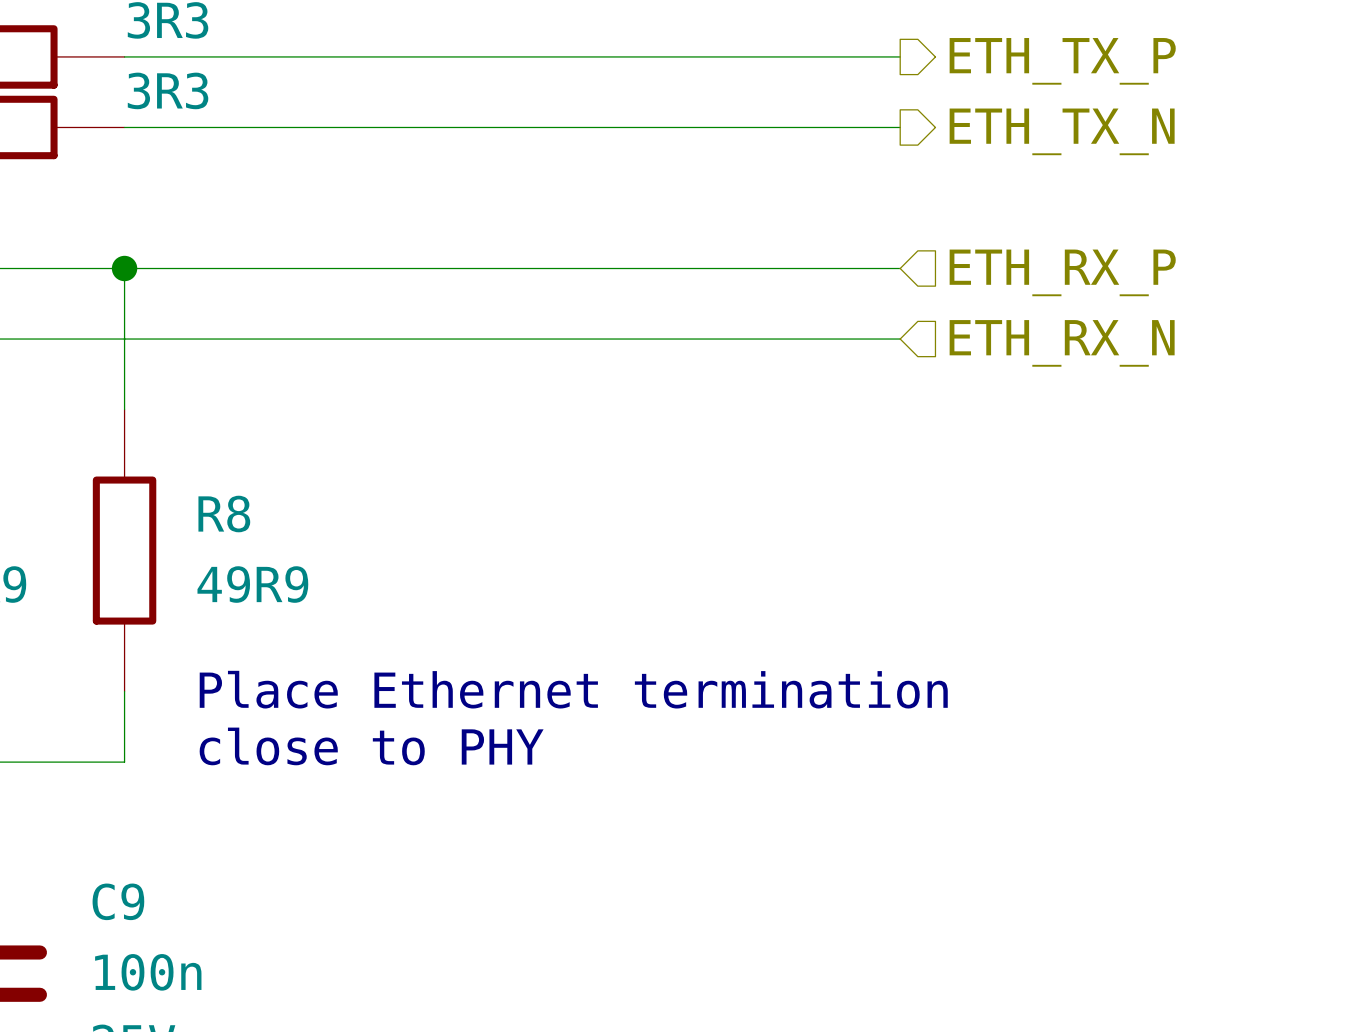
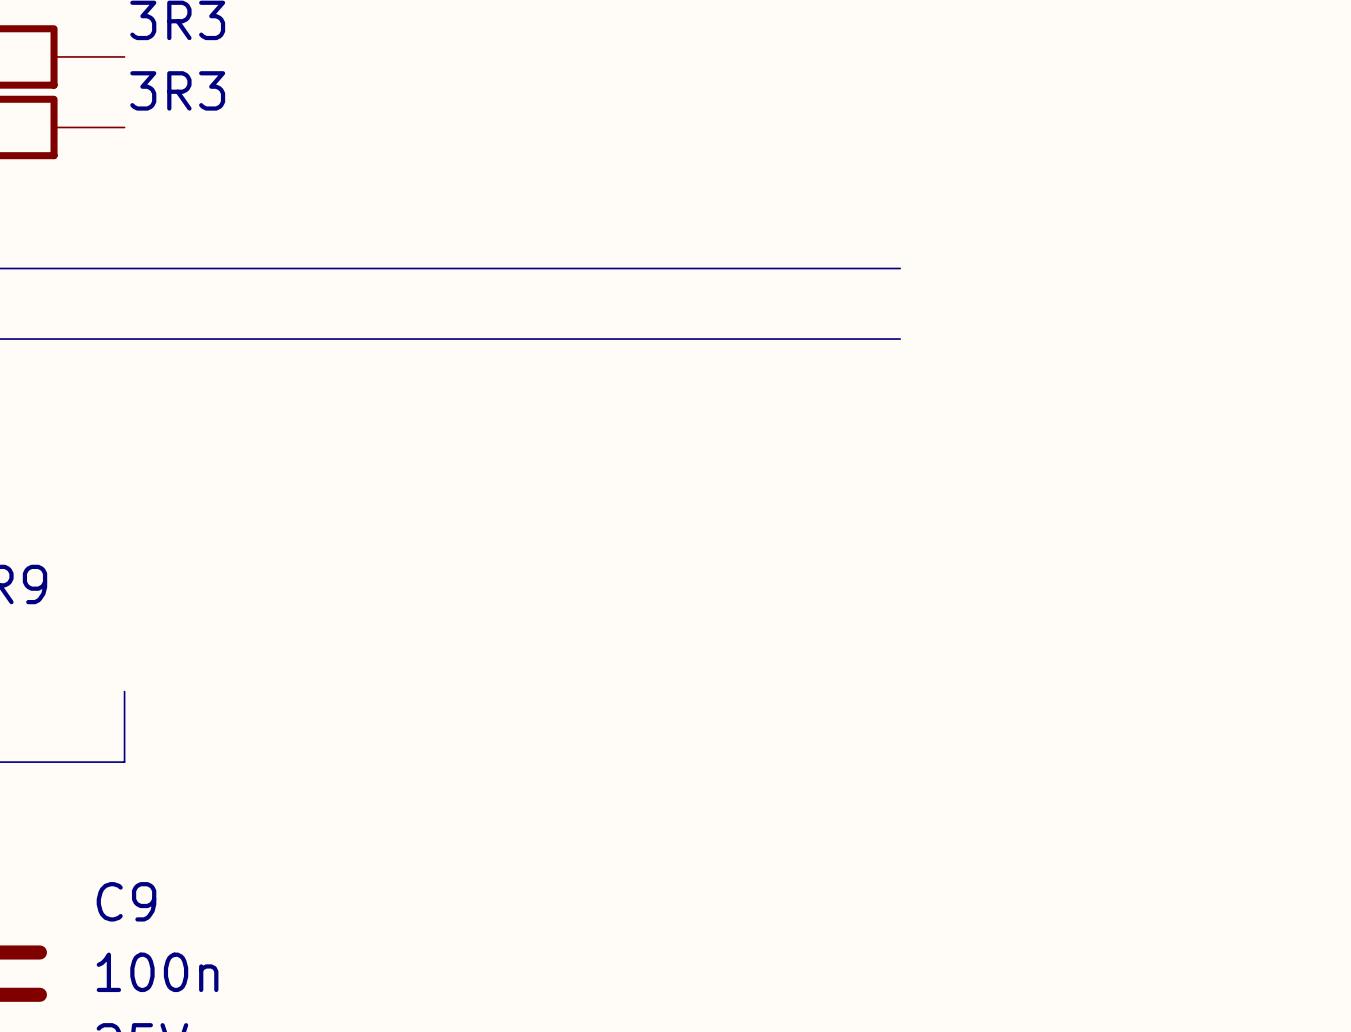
wire: (124, 56) (900, 56) -> none
hierarchical label: ETH_TX_P (1062, 61) -> none
wire: (124, 127) (900, 127) -> none
hierarchical label: ETH_TX_N (1062, 131) -> none
wire: (124, 268) (124, 409) -> none
junction: (124, 268) -> none
hierarchical label: ETH_RX_P (1062, 272) -> none
hierarchical label: ETH_RX_N (1062, 343) -> none
R8: 49R9 (124, 550) -> none
text: Place Ethernet termination (573, 689) -> none
text: close to PHY (371, 746) -> none

